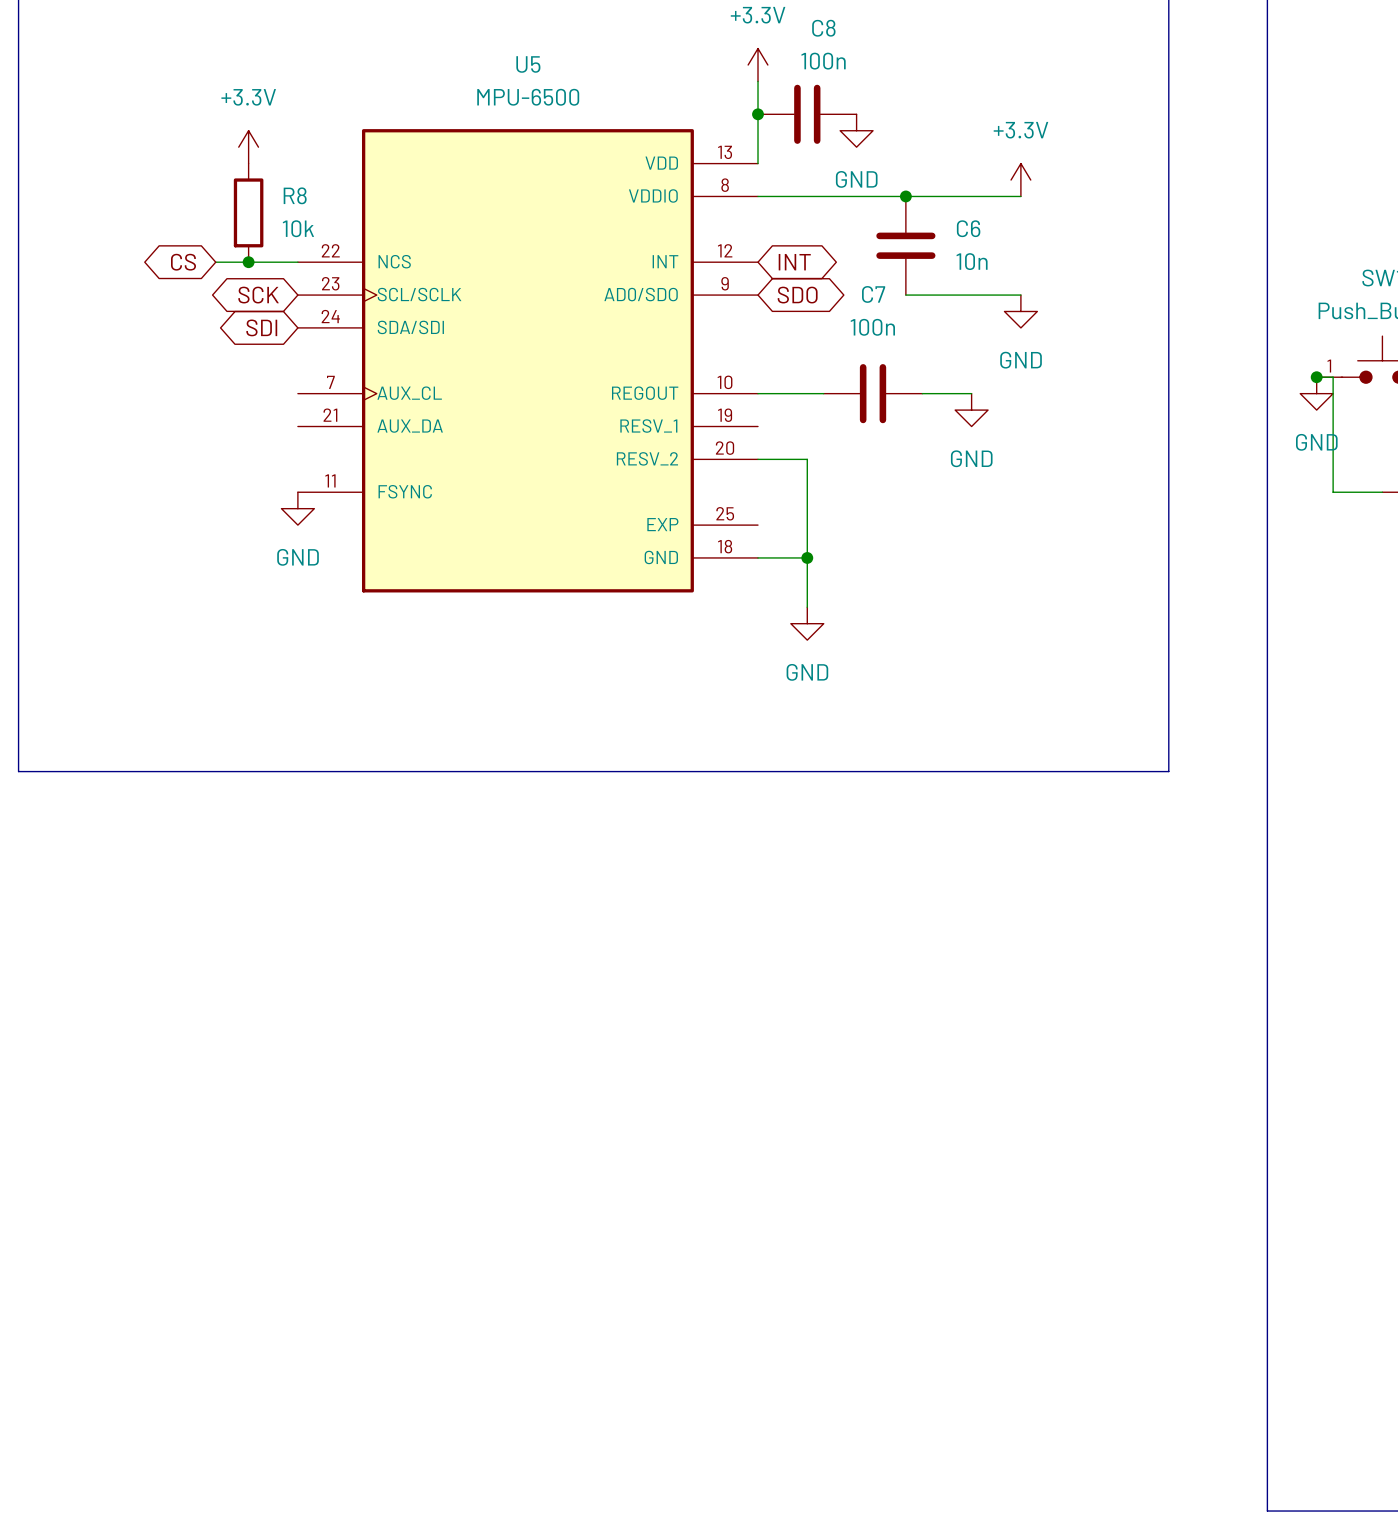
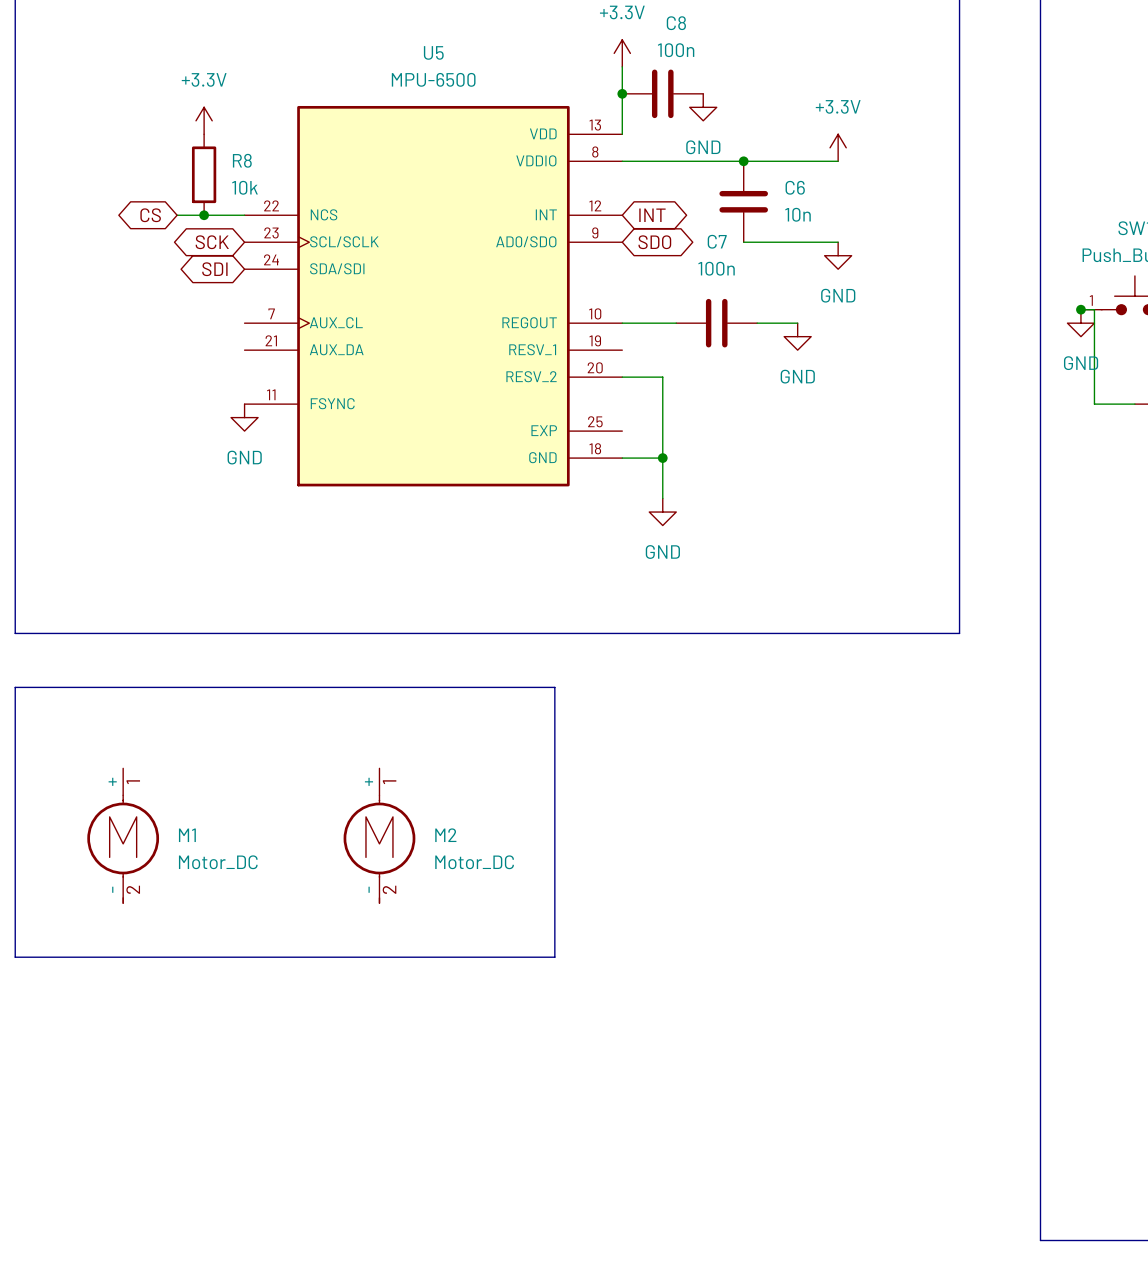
line: none -> (15, 687) (554, 687) (554, 957) (15, 957) (15, 687)
M1: none -> Motor_DC (123, 835)
M2: none -> Motor_DC (379, 835)

